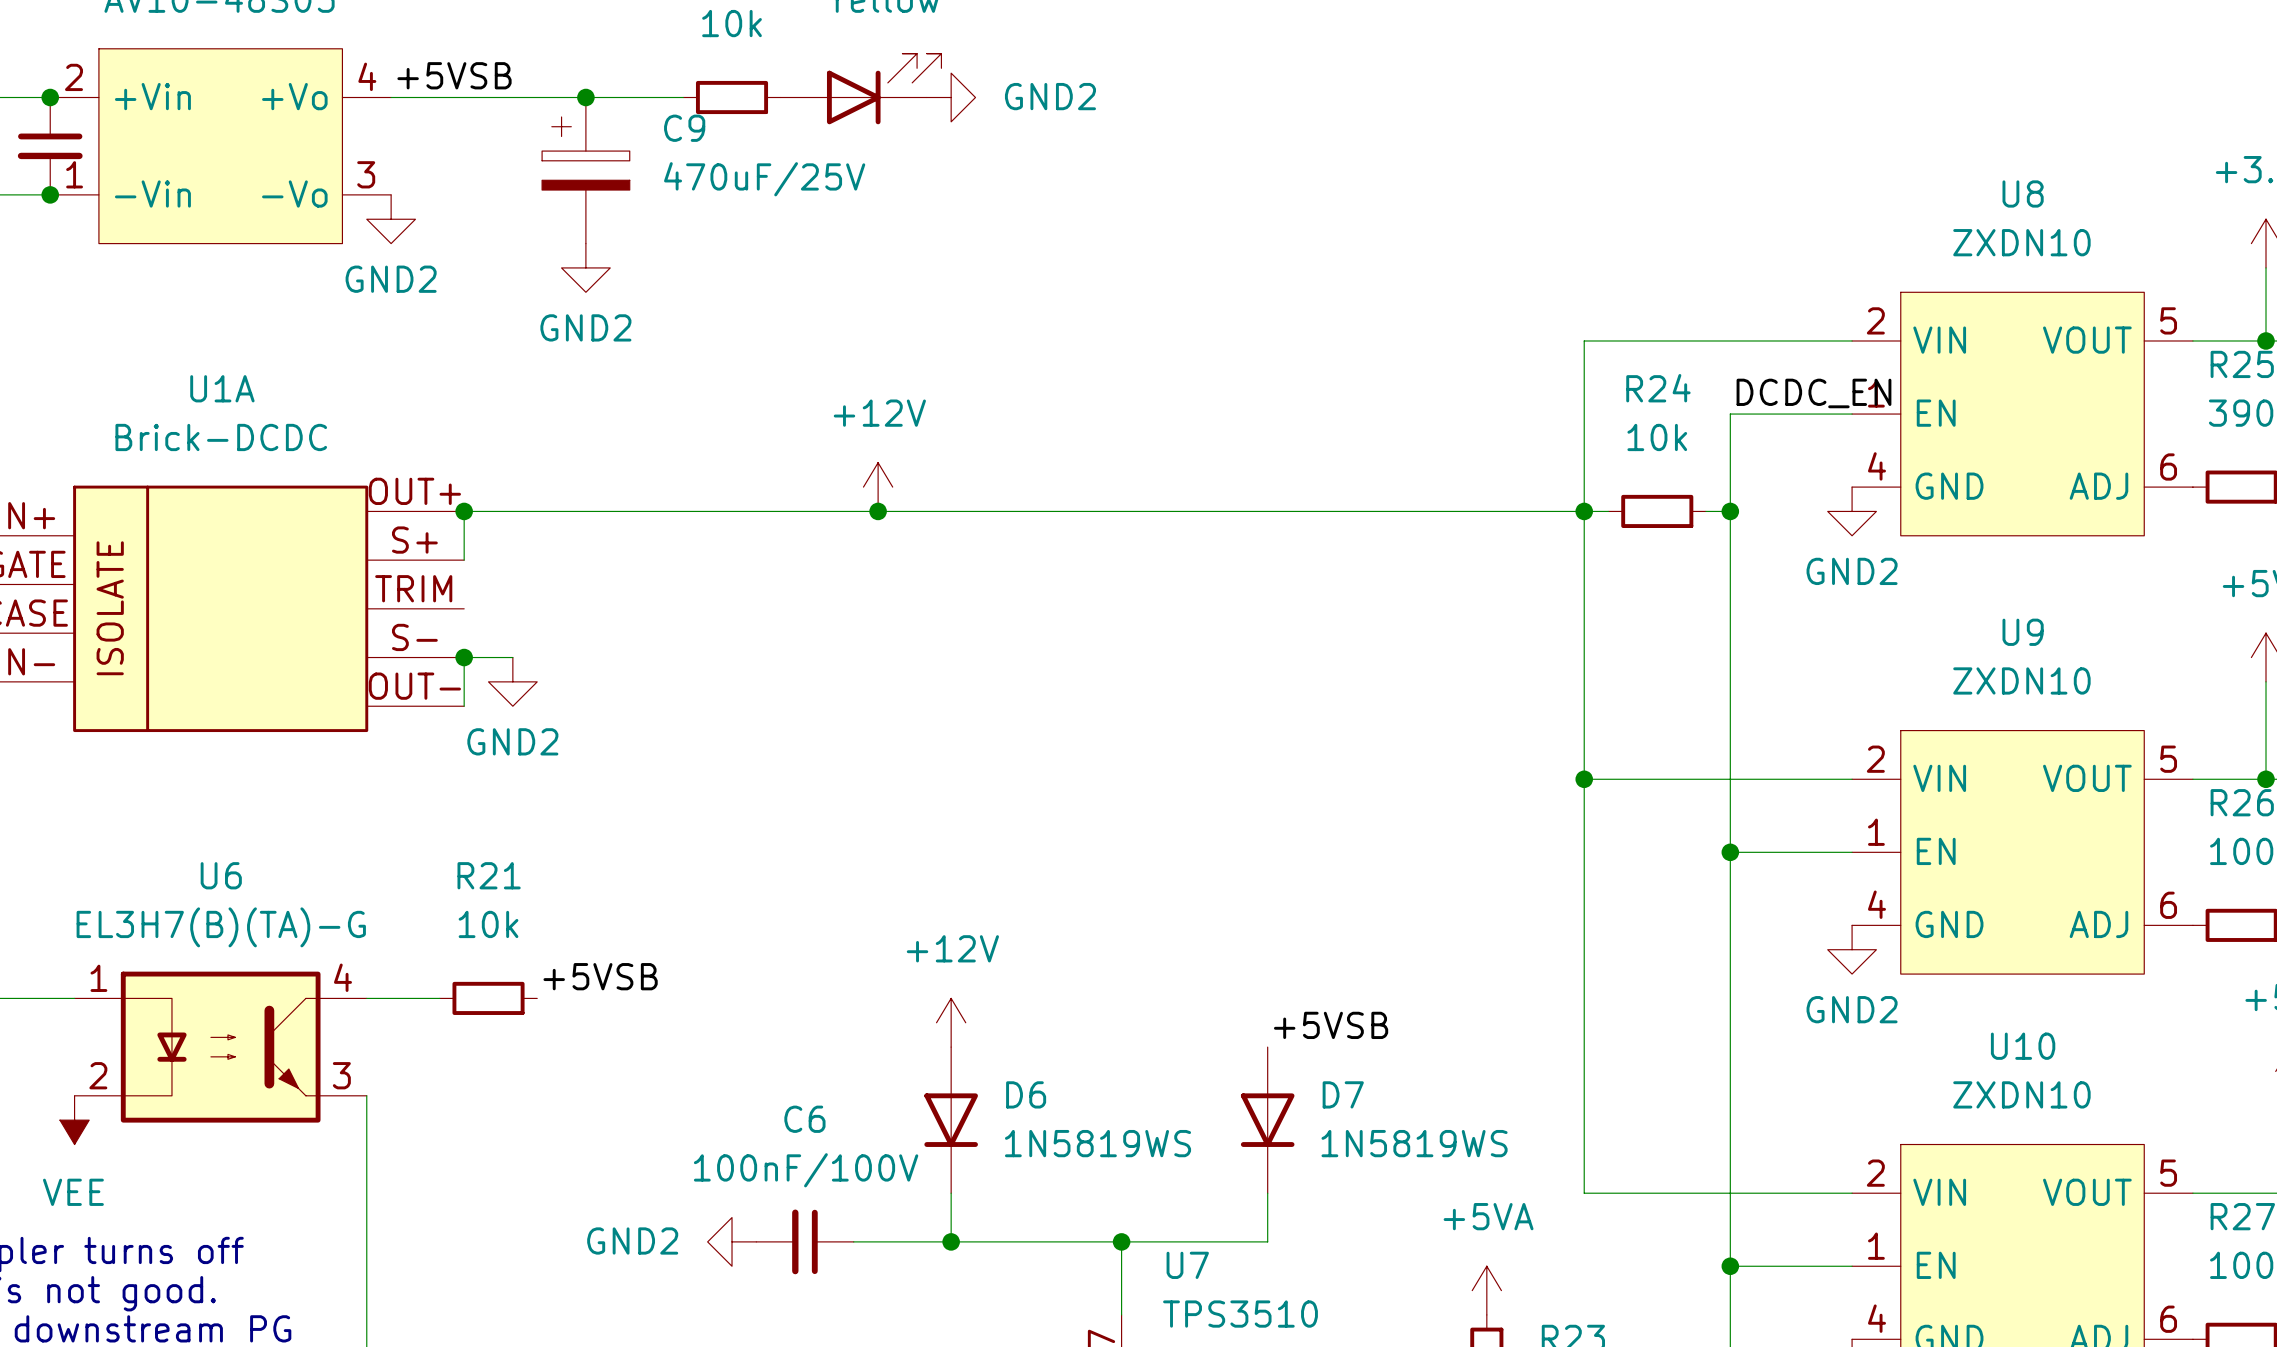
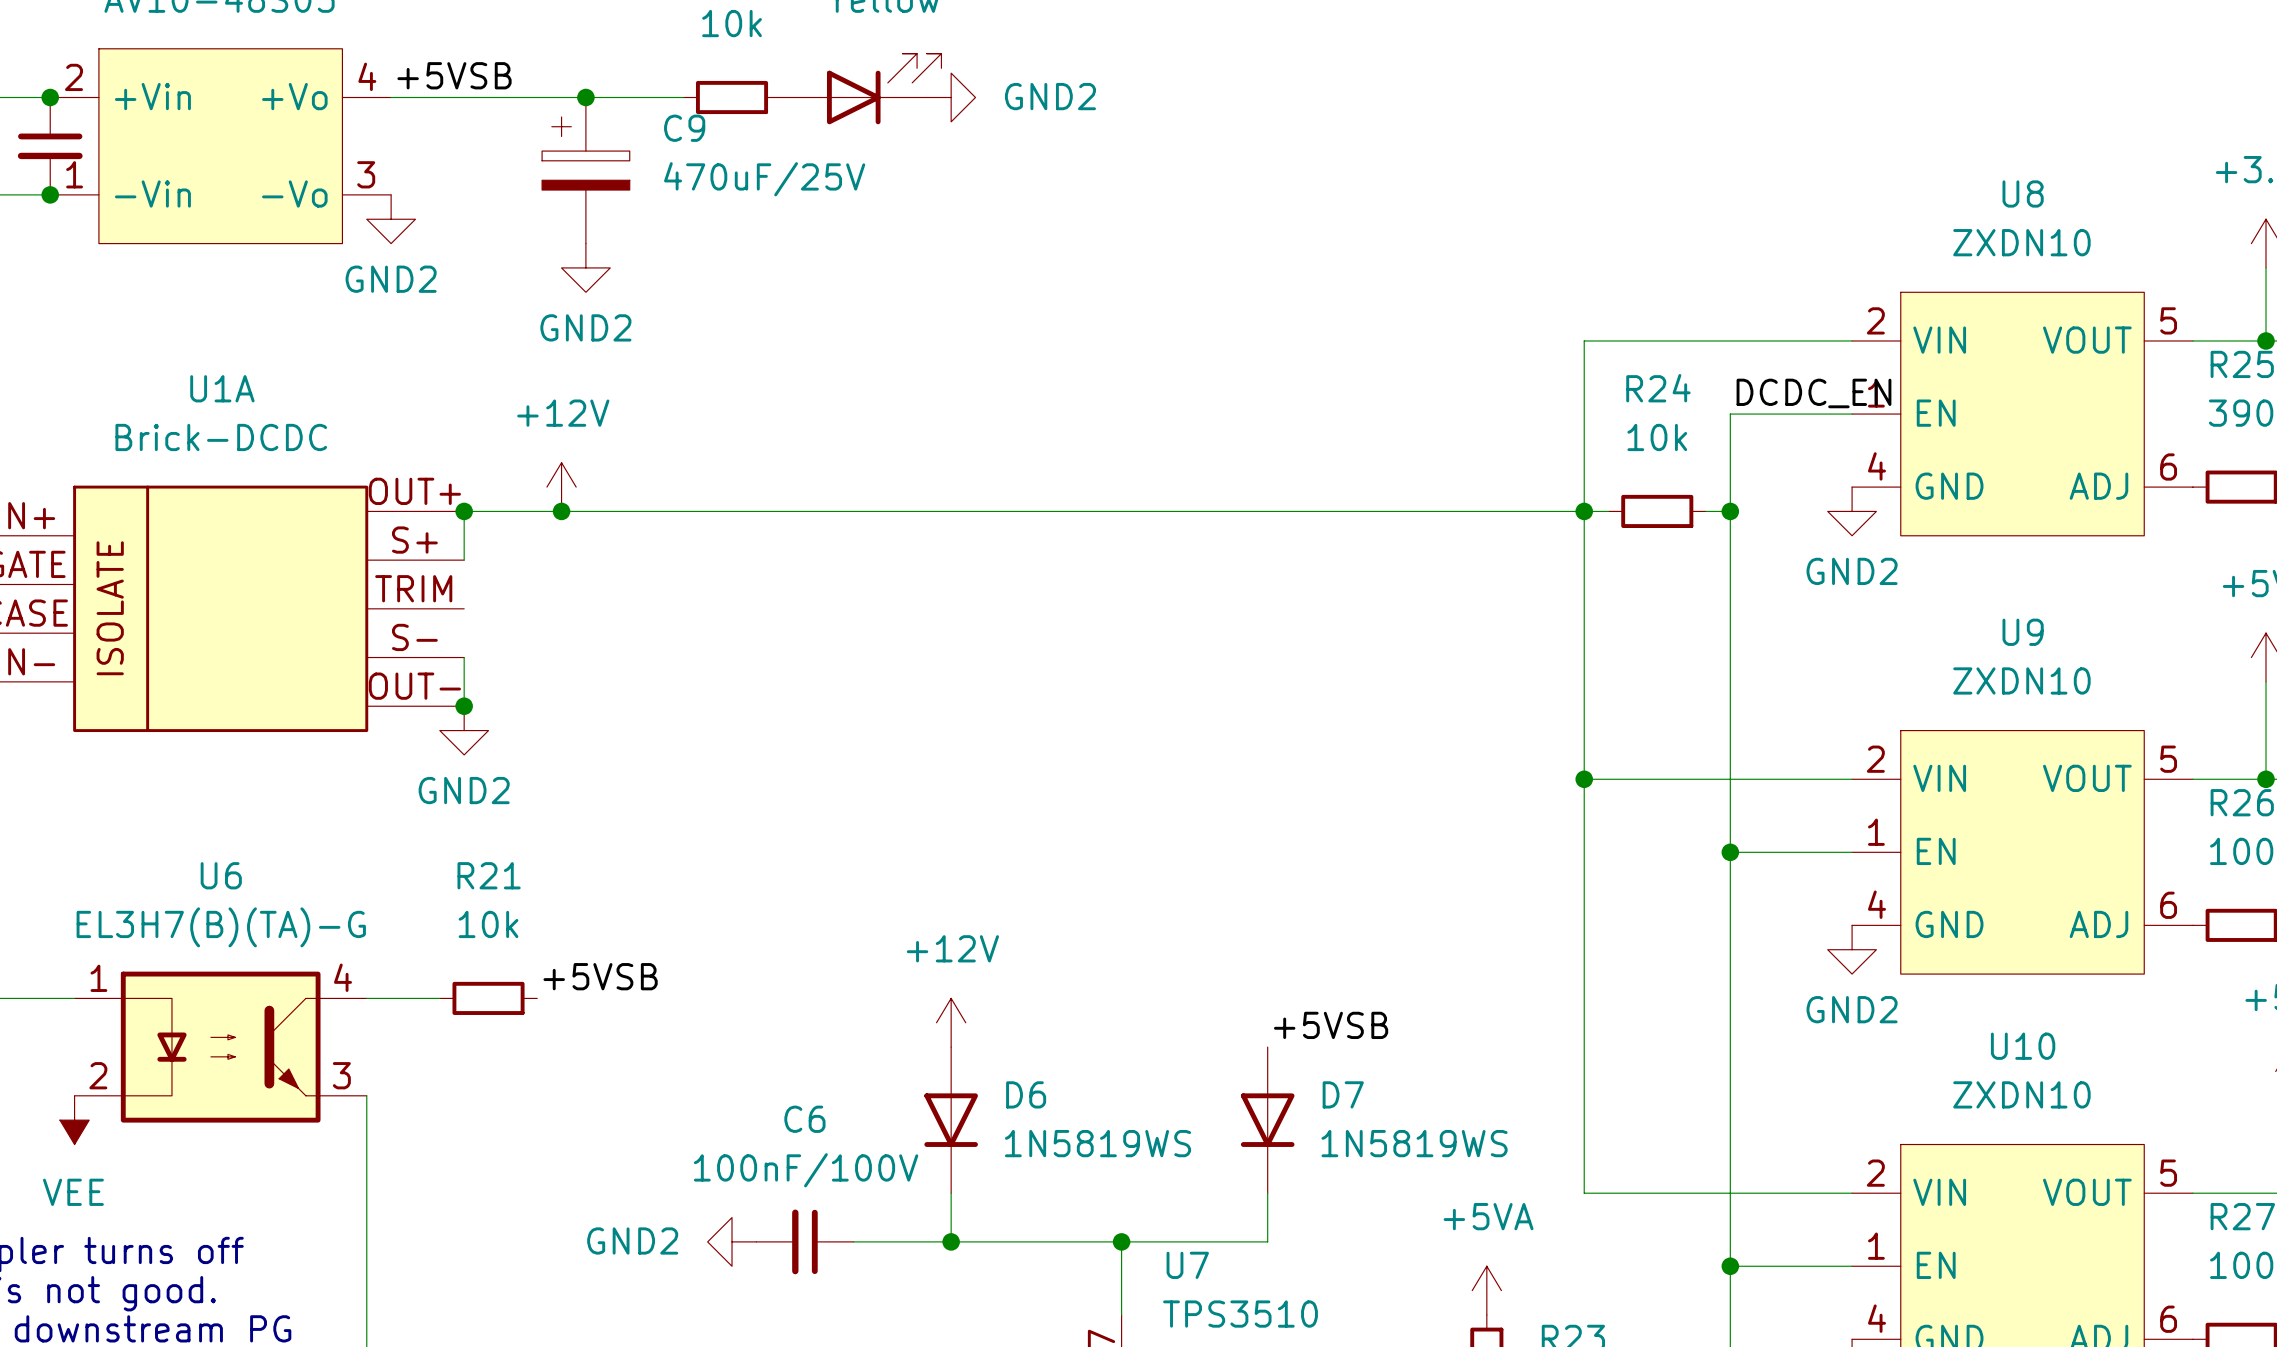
power symbol position: +12V (878, 487) -> +12V (561, 487)
junction: none -> (561, 511)
junction: (878, 511) -> none
wire: (464, 657) (512, 657) -> none
junction position: (464, 657) -> (464, 706)
power symbol position: GND2 (512, 681) -> GND2 (464, 730)

